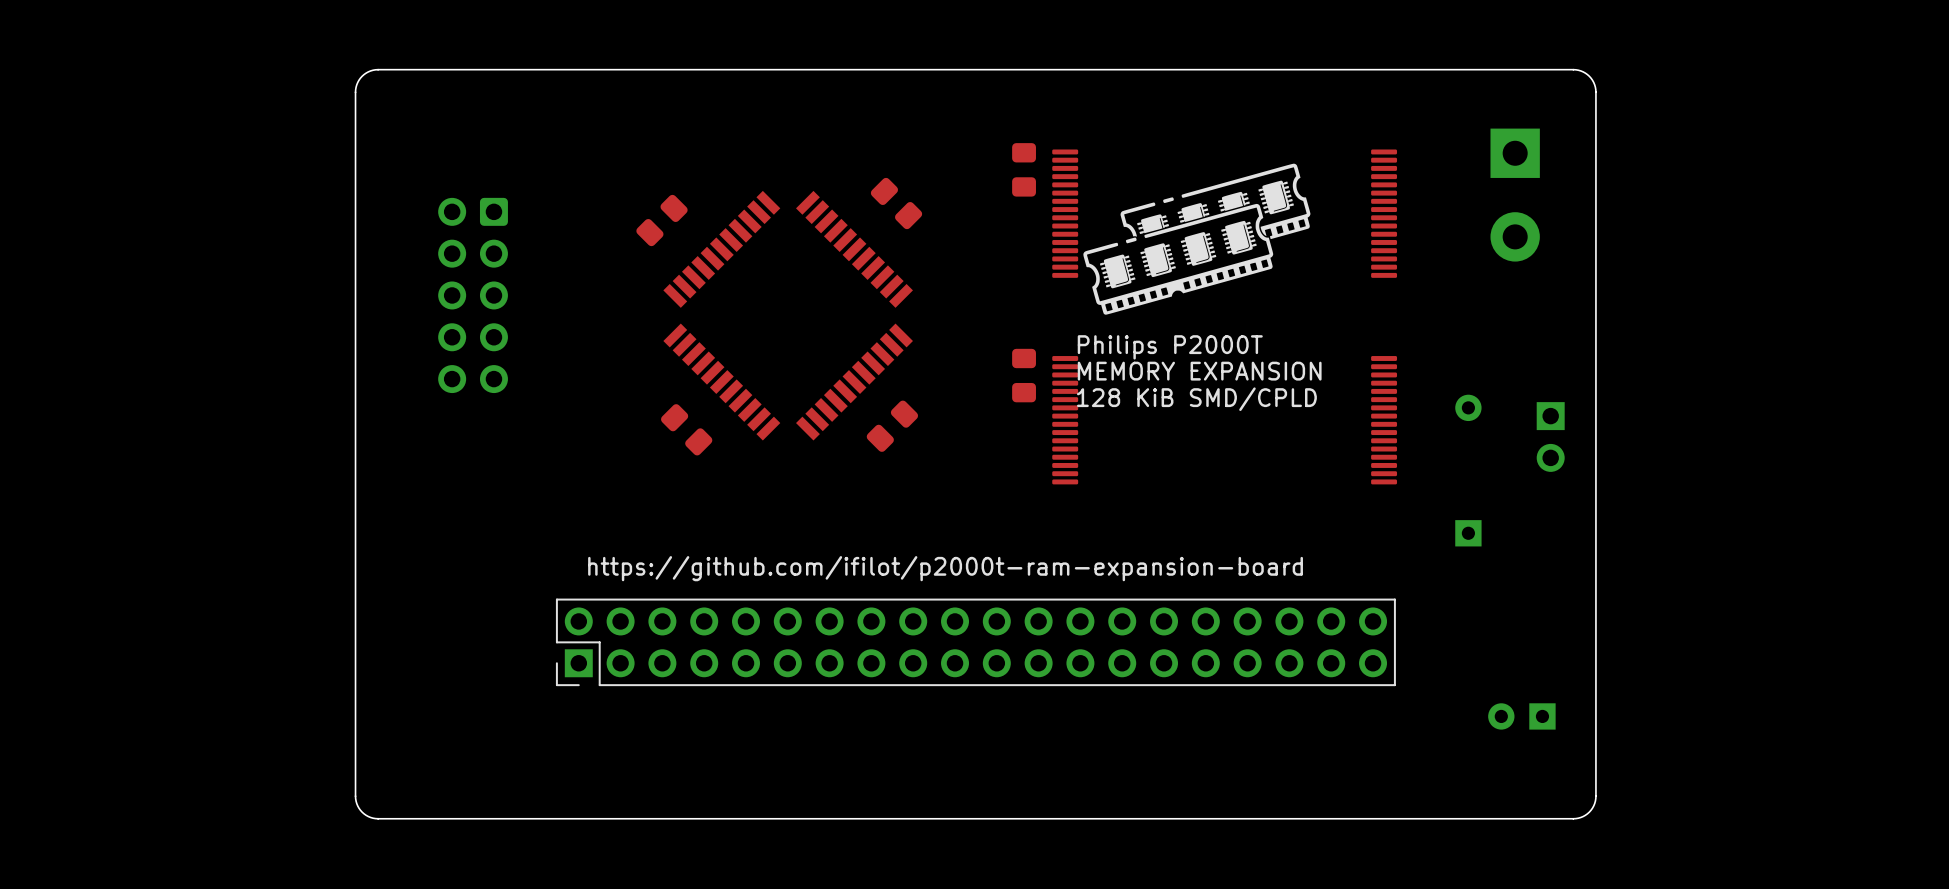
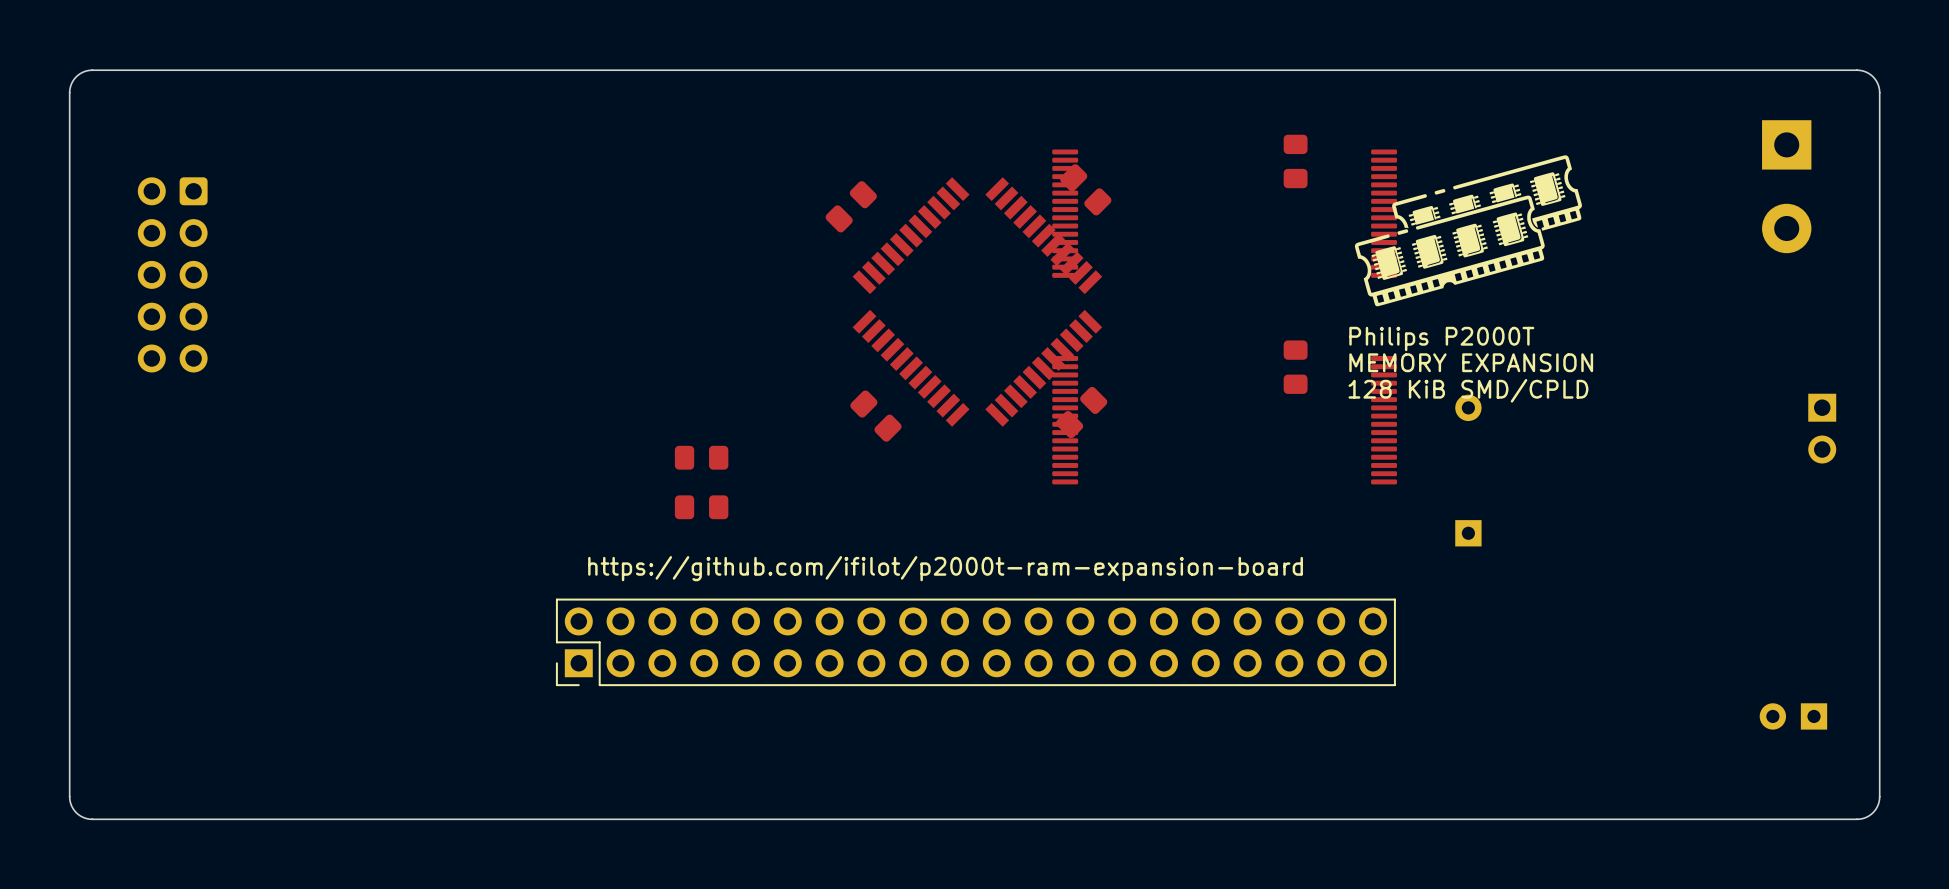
board edge: (1573, 69) (378, 69) (366, 73) (358, 80) (355, 92) (355, 796) (358, 808) (368, 816) (378, 818) (1573, 818) (1585, 815) (1593, 805) (1595, 796) (1595, 92) (1593, 82) (1589, 76) (1580, 70) (1573, 69) -> (1857, 70) (1866, 72) (1873, 76) (1878, 85) (1879, 92) (1879, 796) (1874, 810) (1864, 818) (92, 819) (80, 815) (70, 804) (69, 92) (74, 78) (84, 71) (1857, 70)
part: none -> (1295, 161)
part: (1024, 169) -> none
part: none -> (1085, 189)
part position: (1515, 195) -> (1786, 186)
part rotation: 0° (896, 203) -> 90° clockwise (851, 206)
part position: (896, 203) -> (851, 206)
part: (661, 220) -> none
drawing position: (1196, 239) -> (1468, 230)
part position: (473, 295) -> (172, 274)
part position: (788, 315) -> (977, 301)
text position: Philips P2000T (1170, 347) -> Philips P2000T (1441, 338)
part: none -> (1295, 367)
text position: MEMORY EXPANSION (1199, 371) -> MEMORY EXPANSION (1471, 362)
part: (1024, 375) -> none
text position: 128 KiB SMD/CPLD (1196, 399) -> 128 KiB SMD/CPLD (1468, 390)
part: none -> (1081, 412)
part rotation: 0° (892, 426) -> 90° clockwise (875, 416)
part: (686, 429) -> none
part position: (1550, 437) -> (1822, 428)
part: none -> (701, 457)
part: none -> (701, 507)
part position: (1521, 716) -> (1793, 716)

